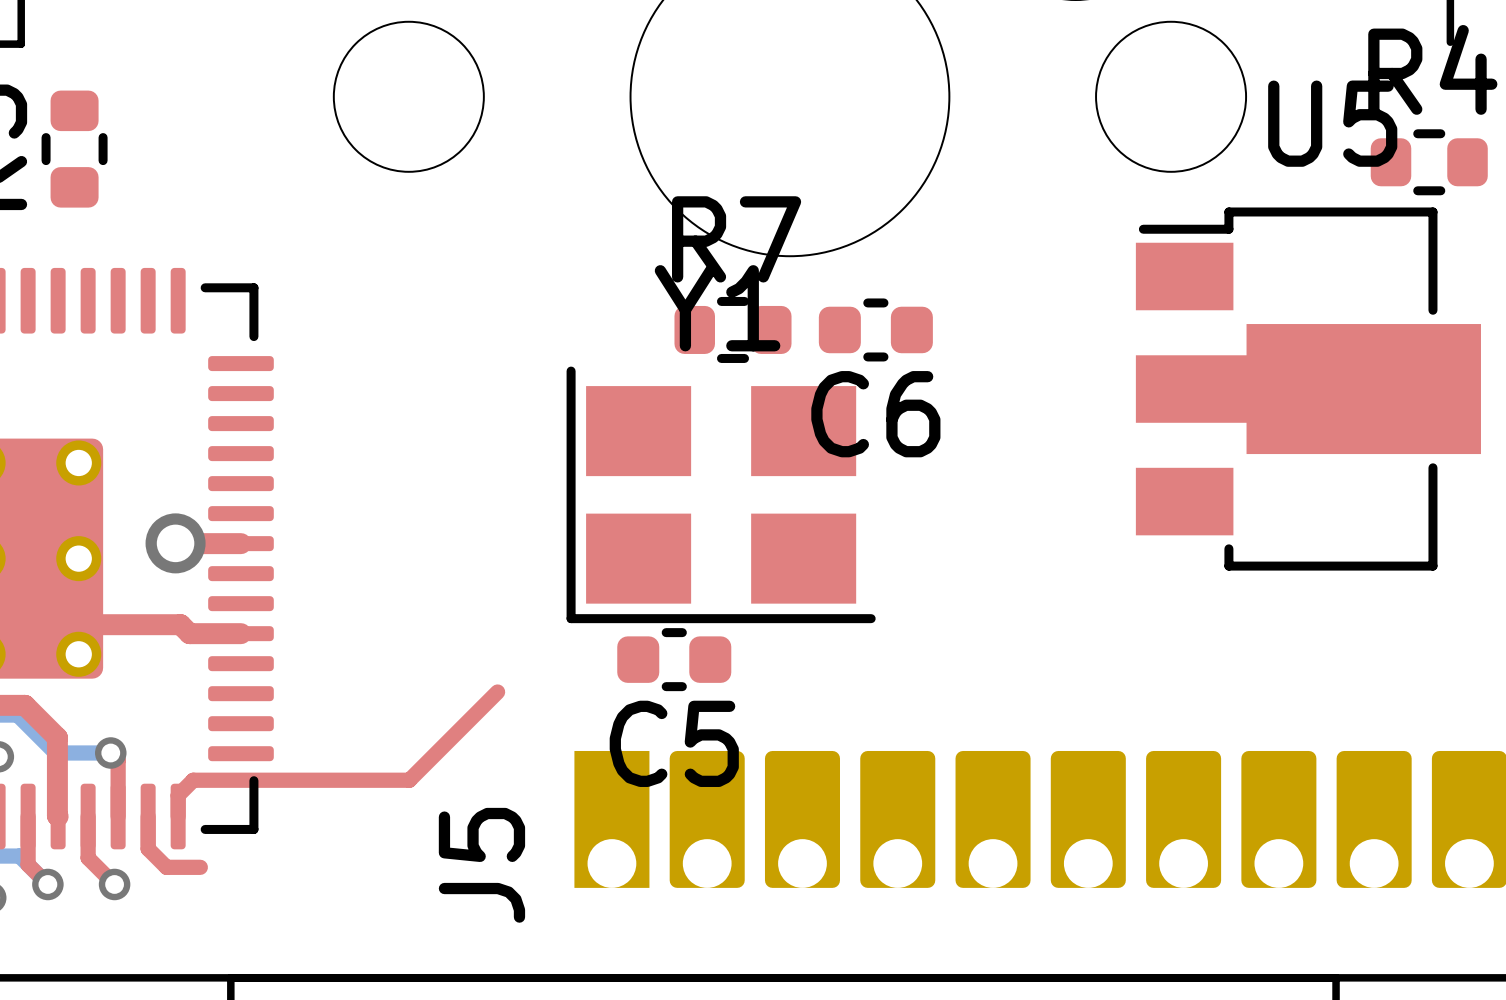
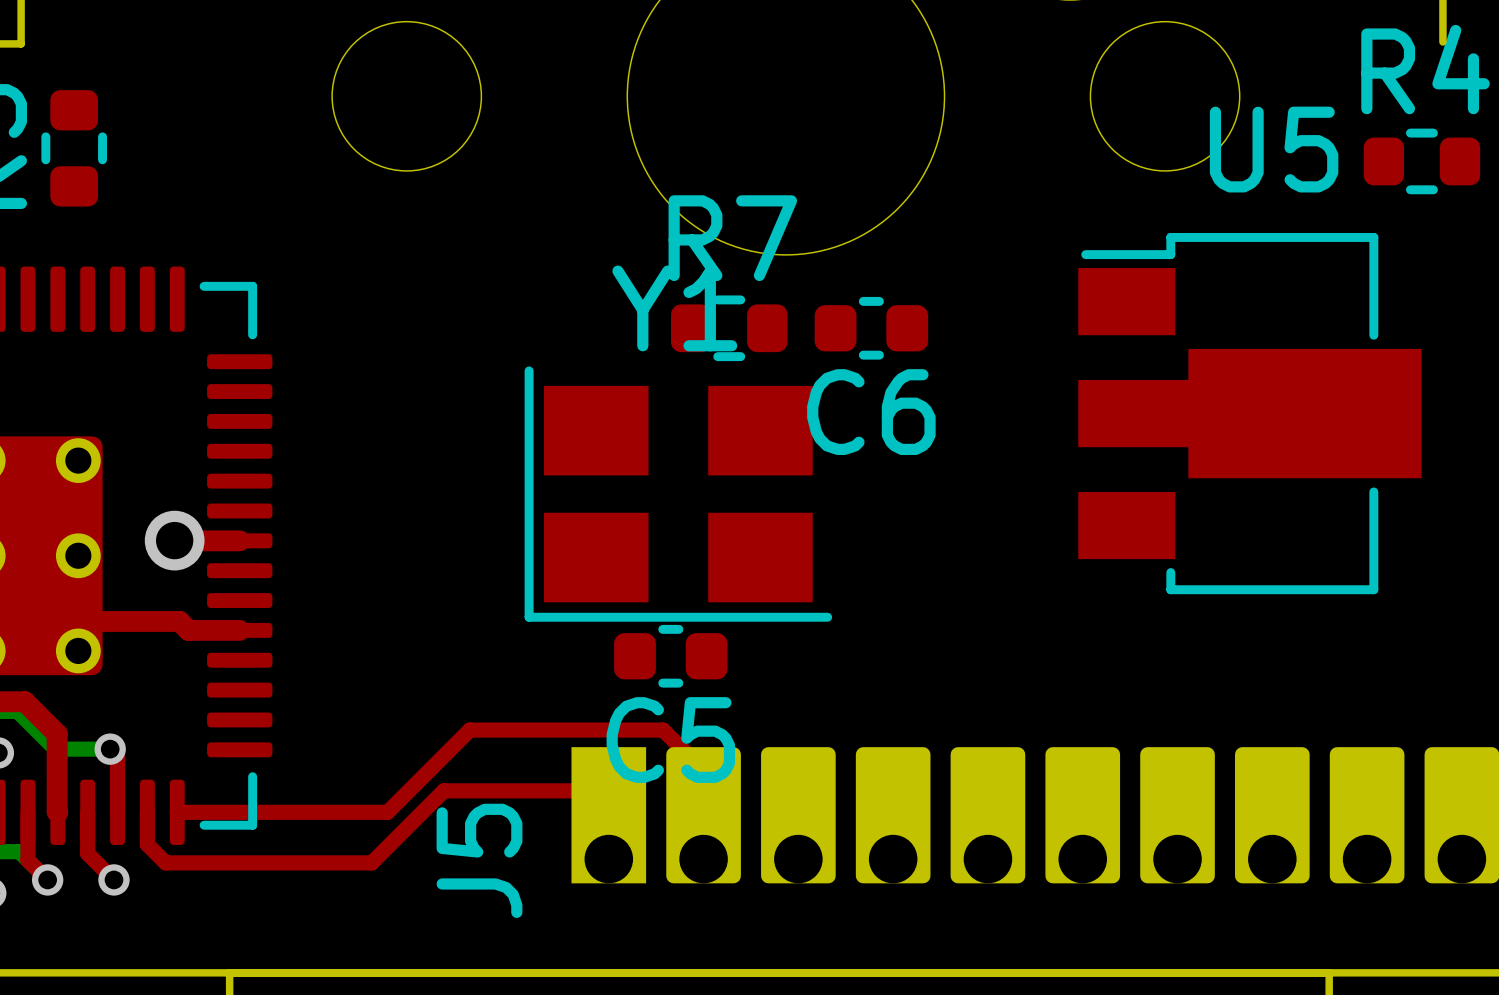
U5 position: (1308, 389) -> (1249, 413)
Y1 position: (721, 494) -> (678, 494)
top track: (497, 692) (409, 780) (193, 780) (178, 795) (178, 816) -> (703, 859) (703, 781) (684, 762) (684, 751) (663, 730) (469, 730) (387, 812) (177, 812)
top track: none -> (608, 859) (608, 809) (589, 790) (443, 790) (371, 862) (199, 862)

